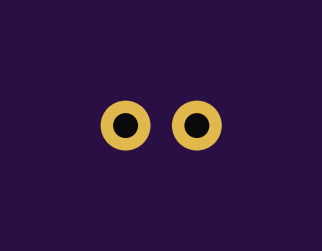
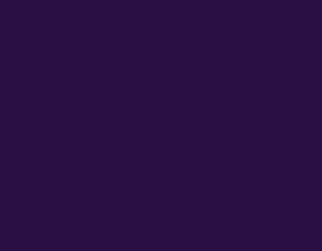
part: (161, 125) -> none

